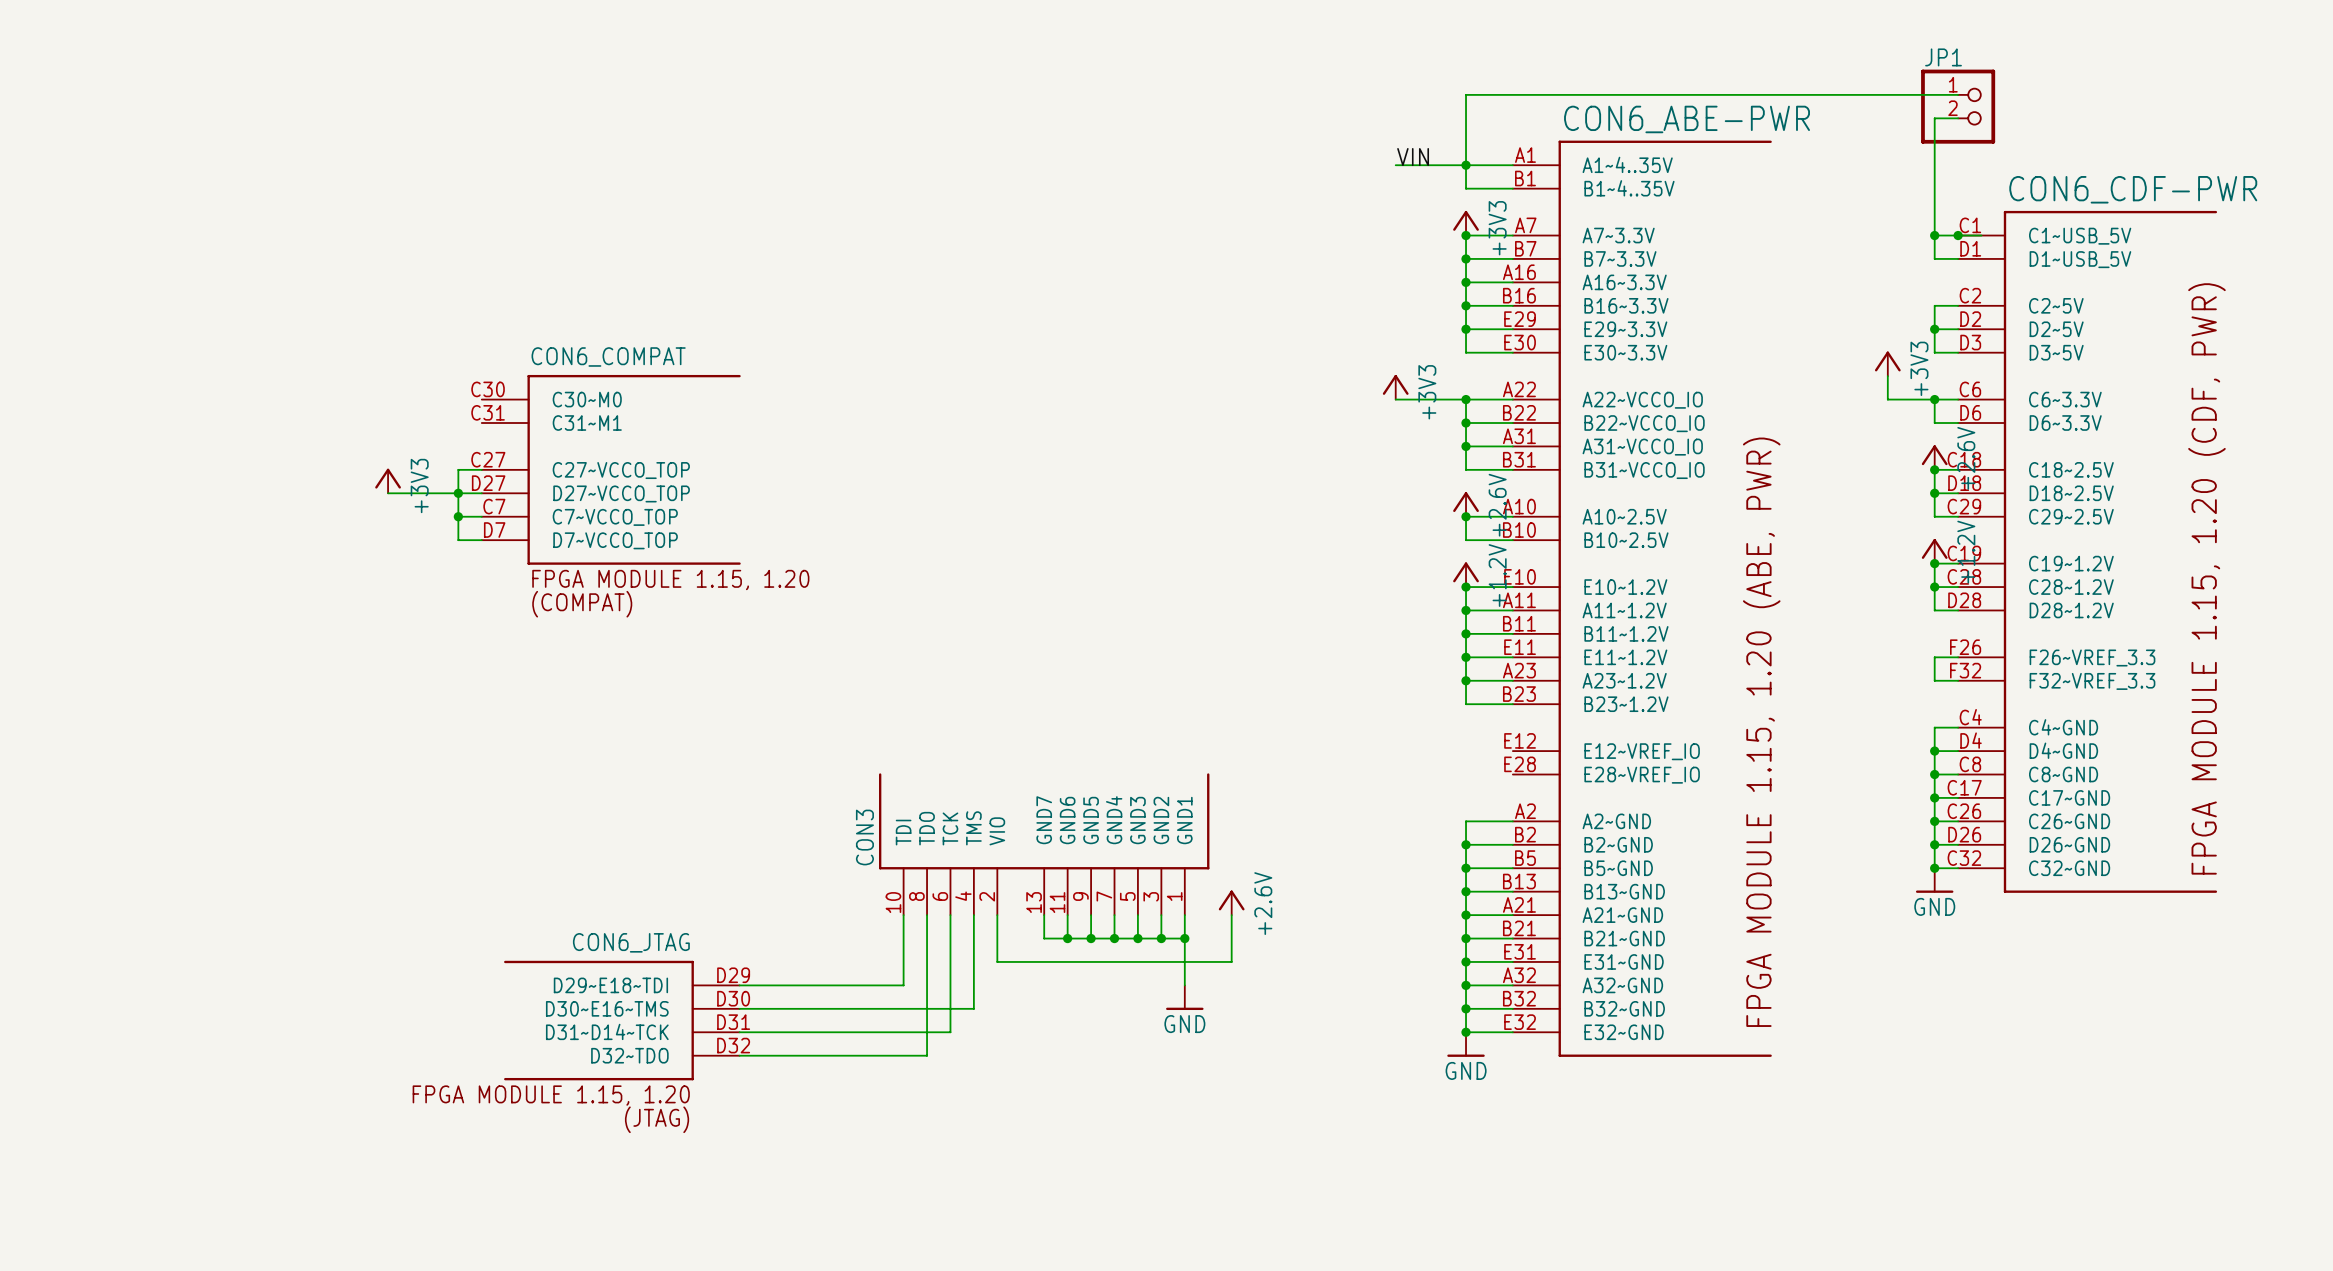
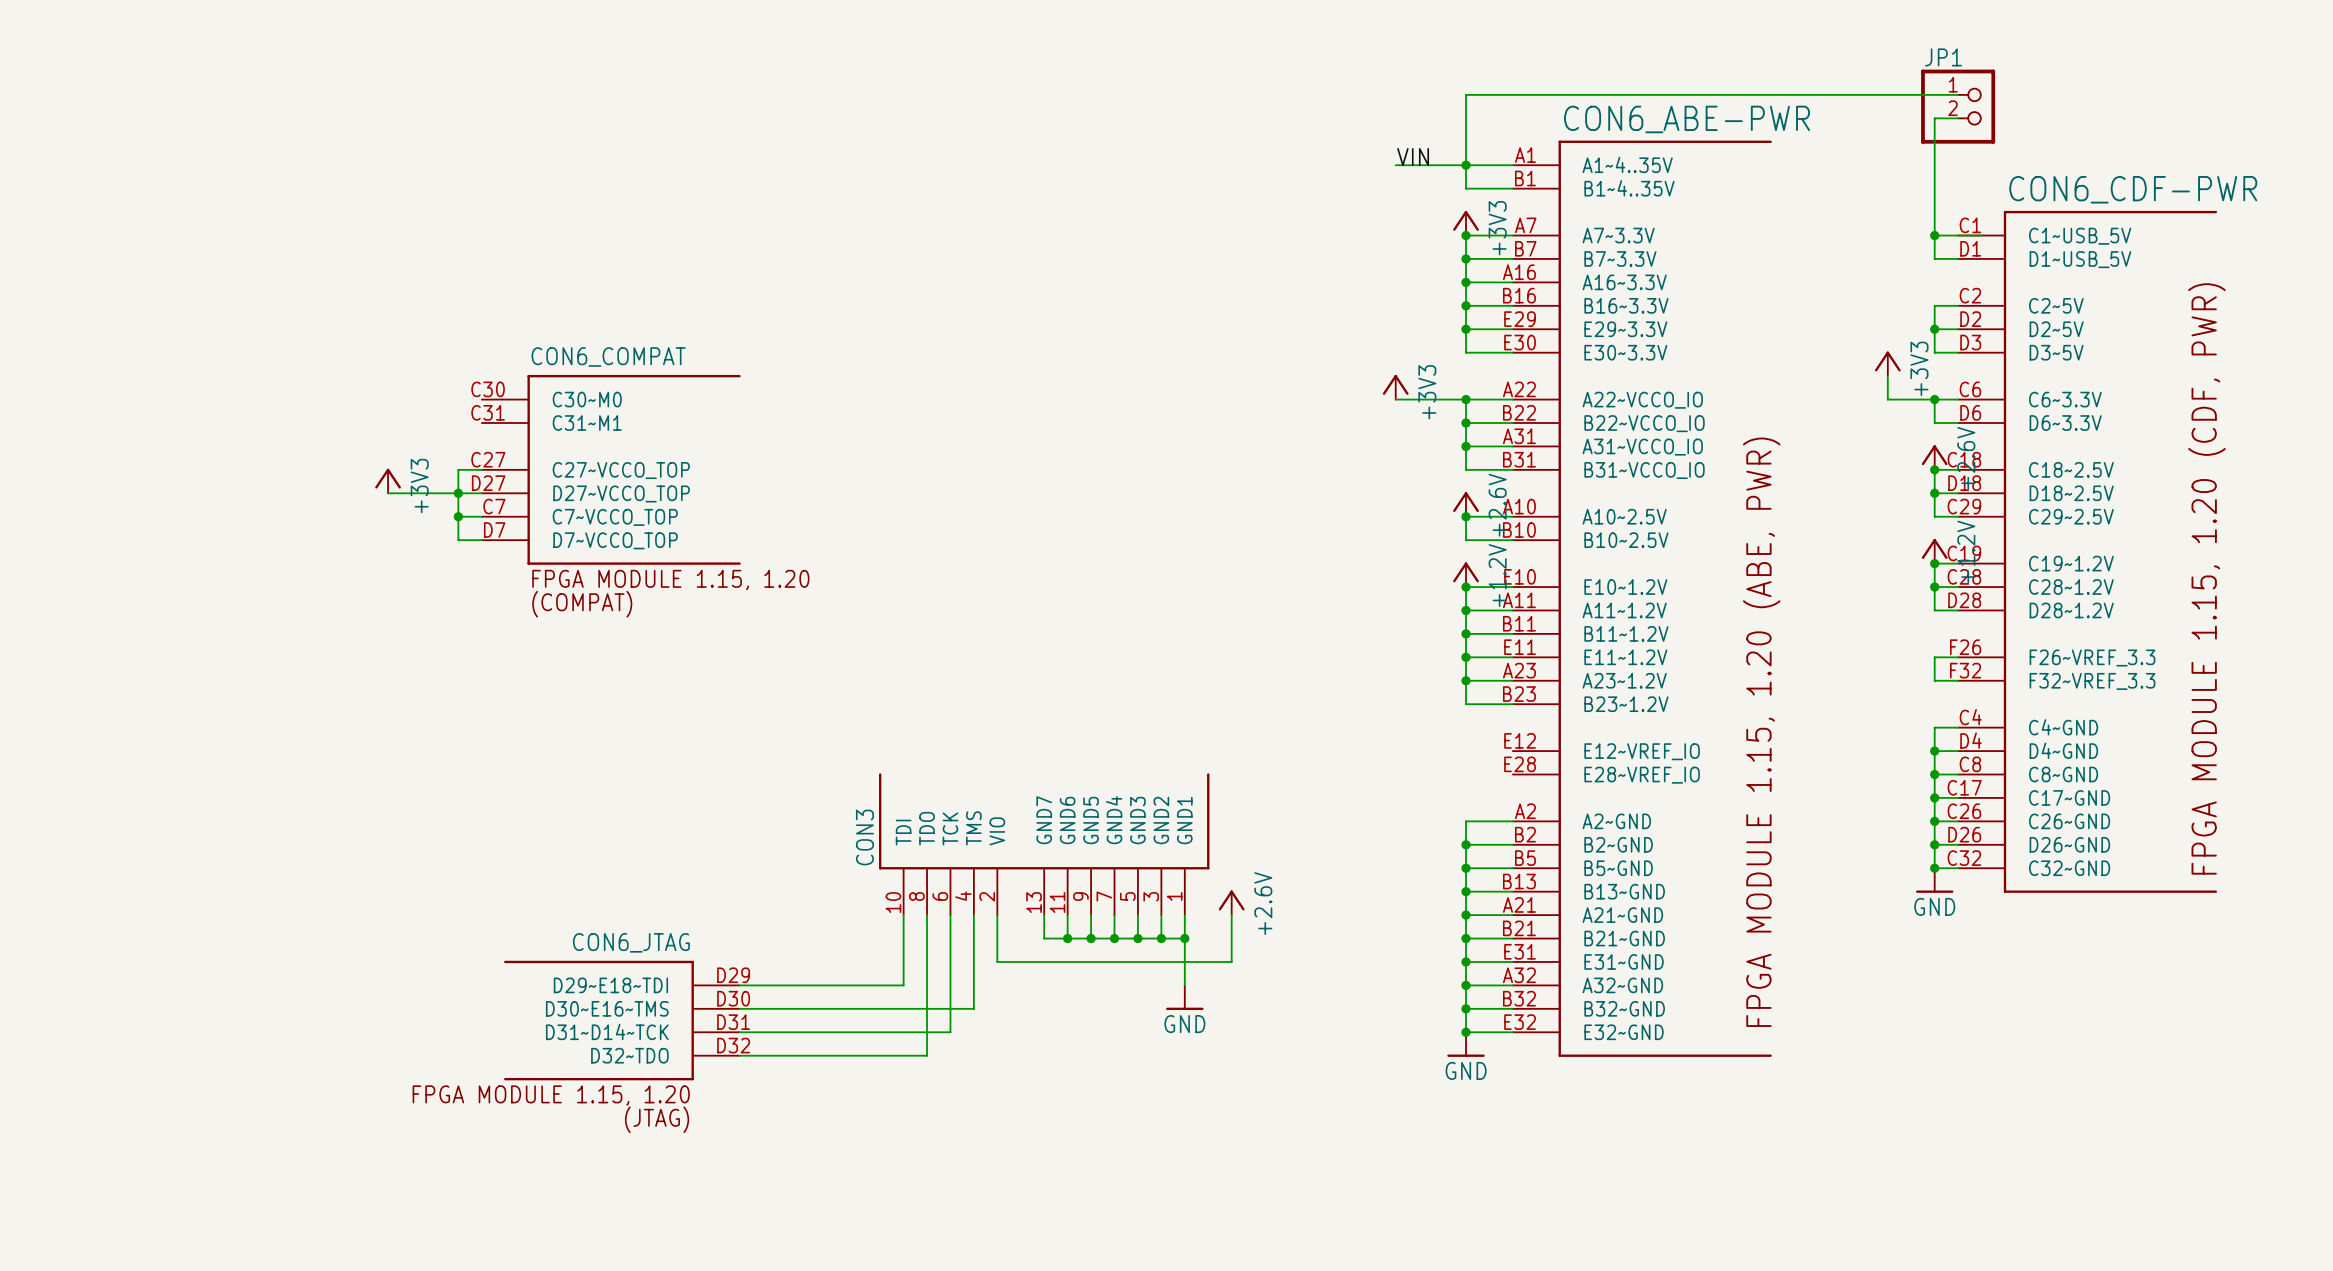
junction: (1958, 235) -> none

